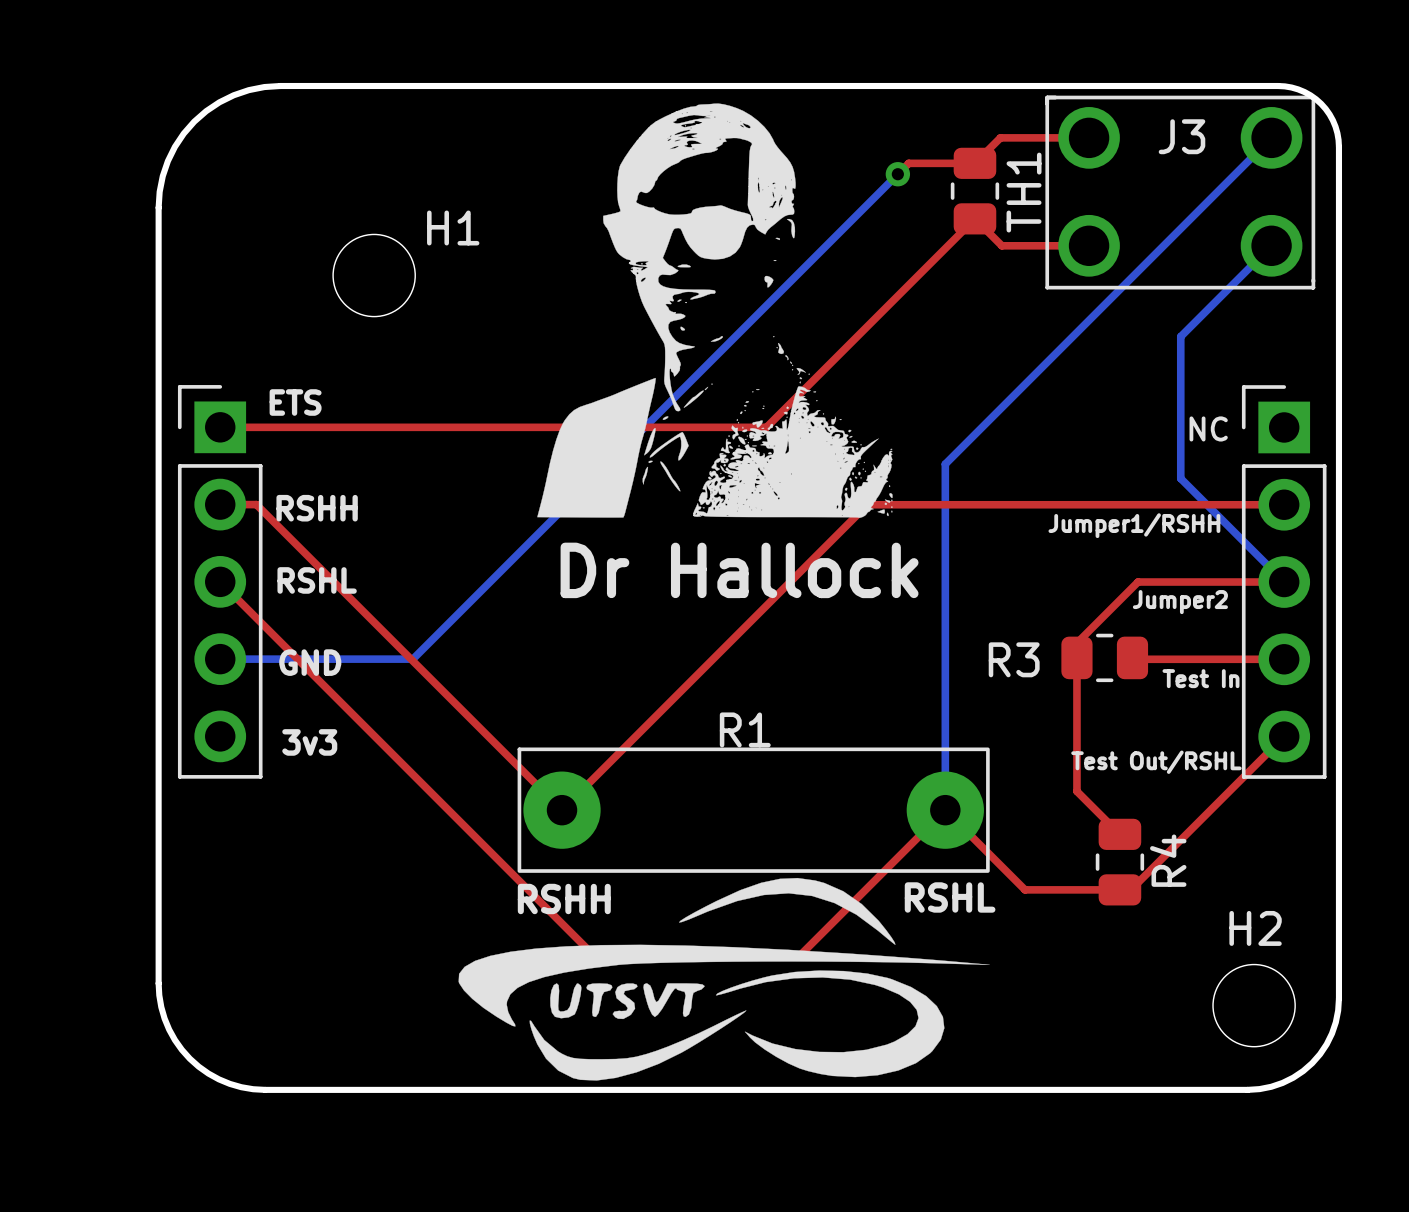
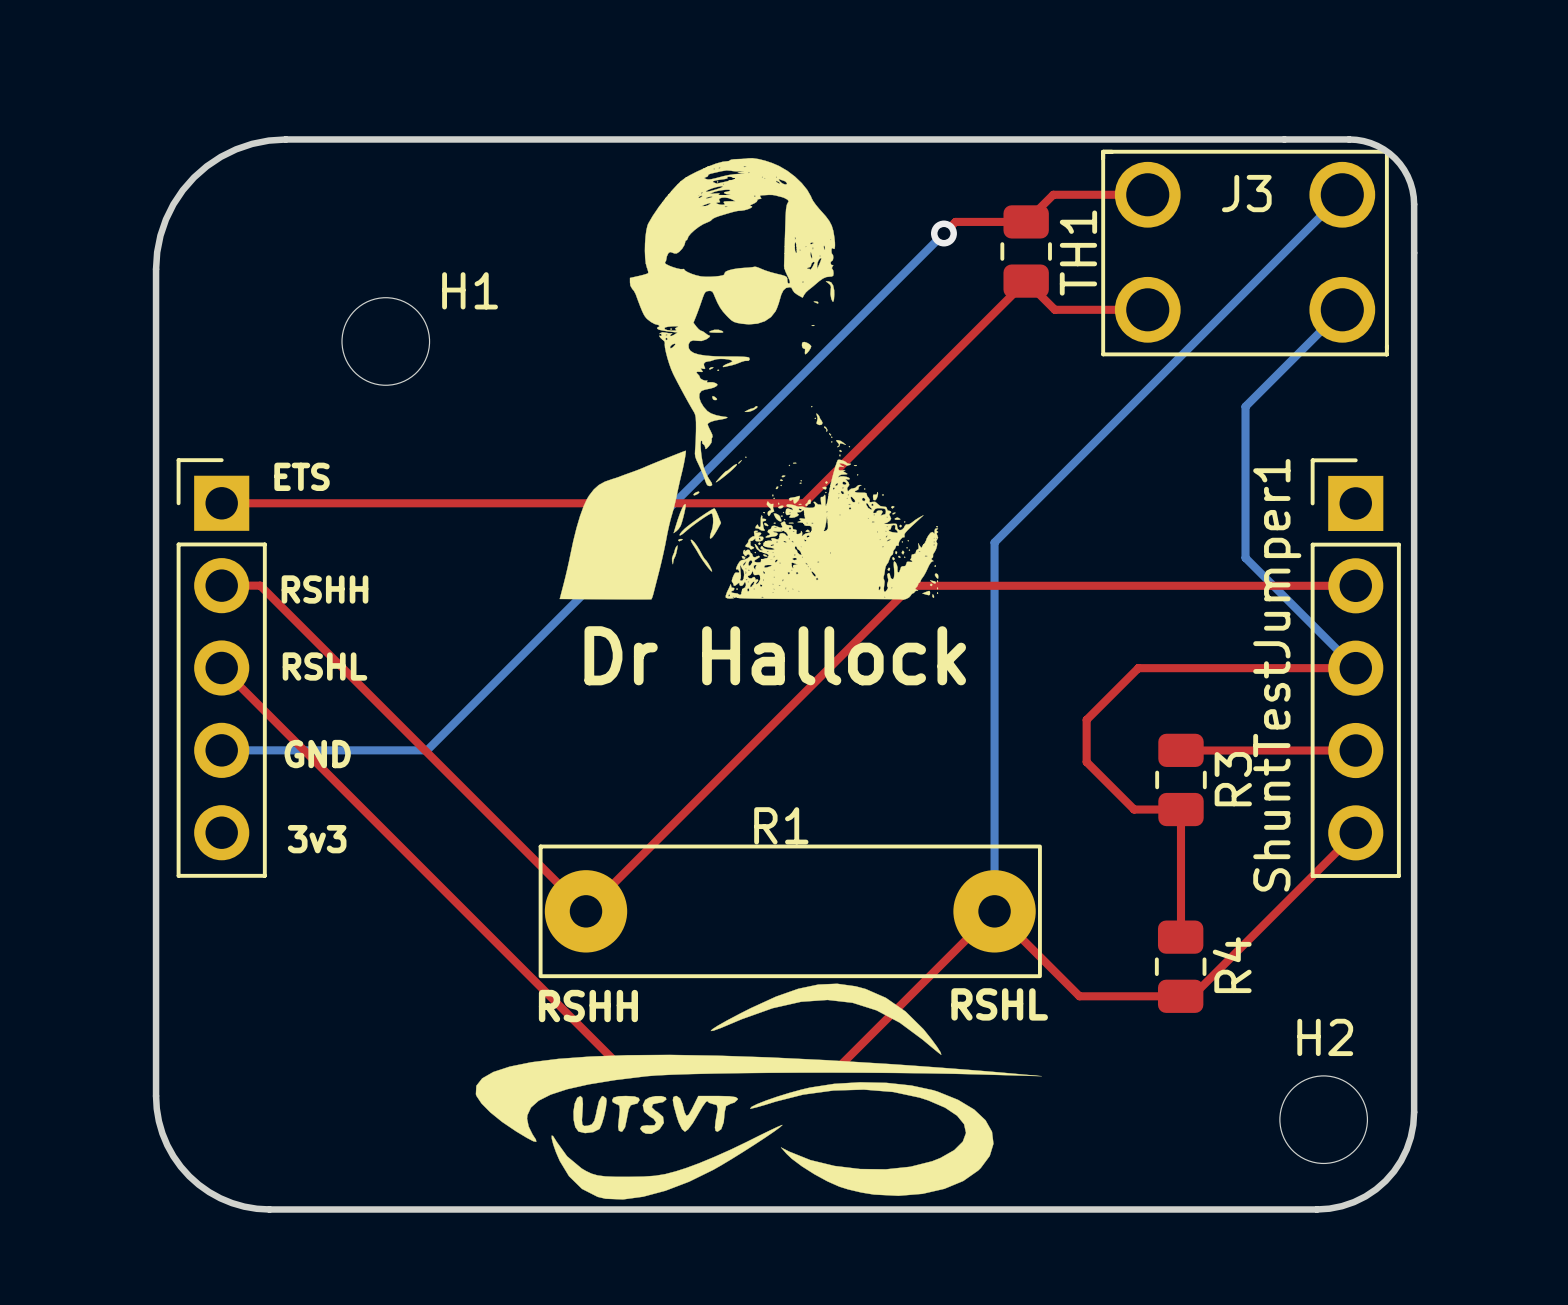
text: NC (1208, 428) -> none
text: Jumper1/RSHH (1134, 525) -> none
top track: none -> (1138, 668) (1199, 668)
top track: (1138, 582) (1076, 643) (1076, 791) (1119, 834) -> (1138, 668) (1086, 719) (1086, 762) (1134, 809) (1180, 809) (1180, 936)
ShuntTestJumper1 name: none -> ShuntTestJumper1 (1277, 675)
text: Jumper2 (1180, 602) -> none
R3 rotation: 0° (1104, 657) -> 90° clockwise (1180, 779)
R3 name position: R3 (1014, 659) -> R3 (1233, 779)
text: Test In (1200, 678) -> none
text: Test Out/RSHL (1156, 762) -> none

